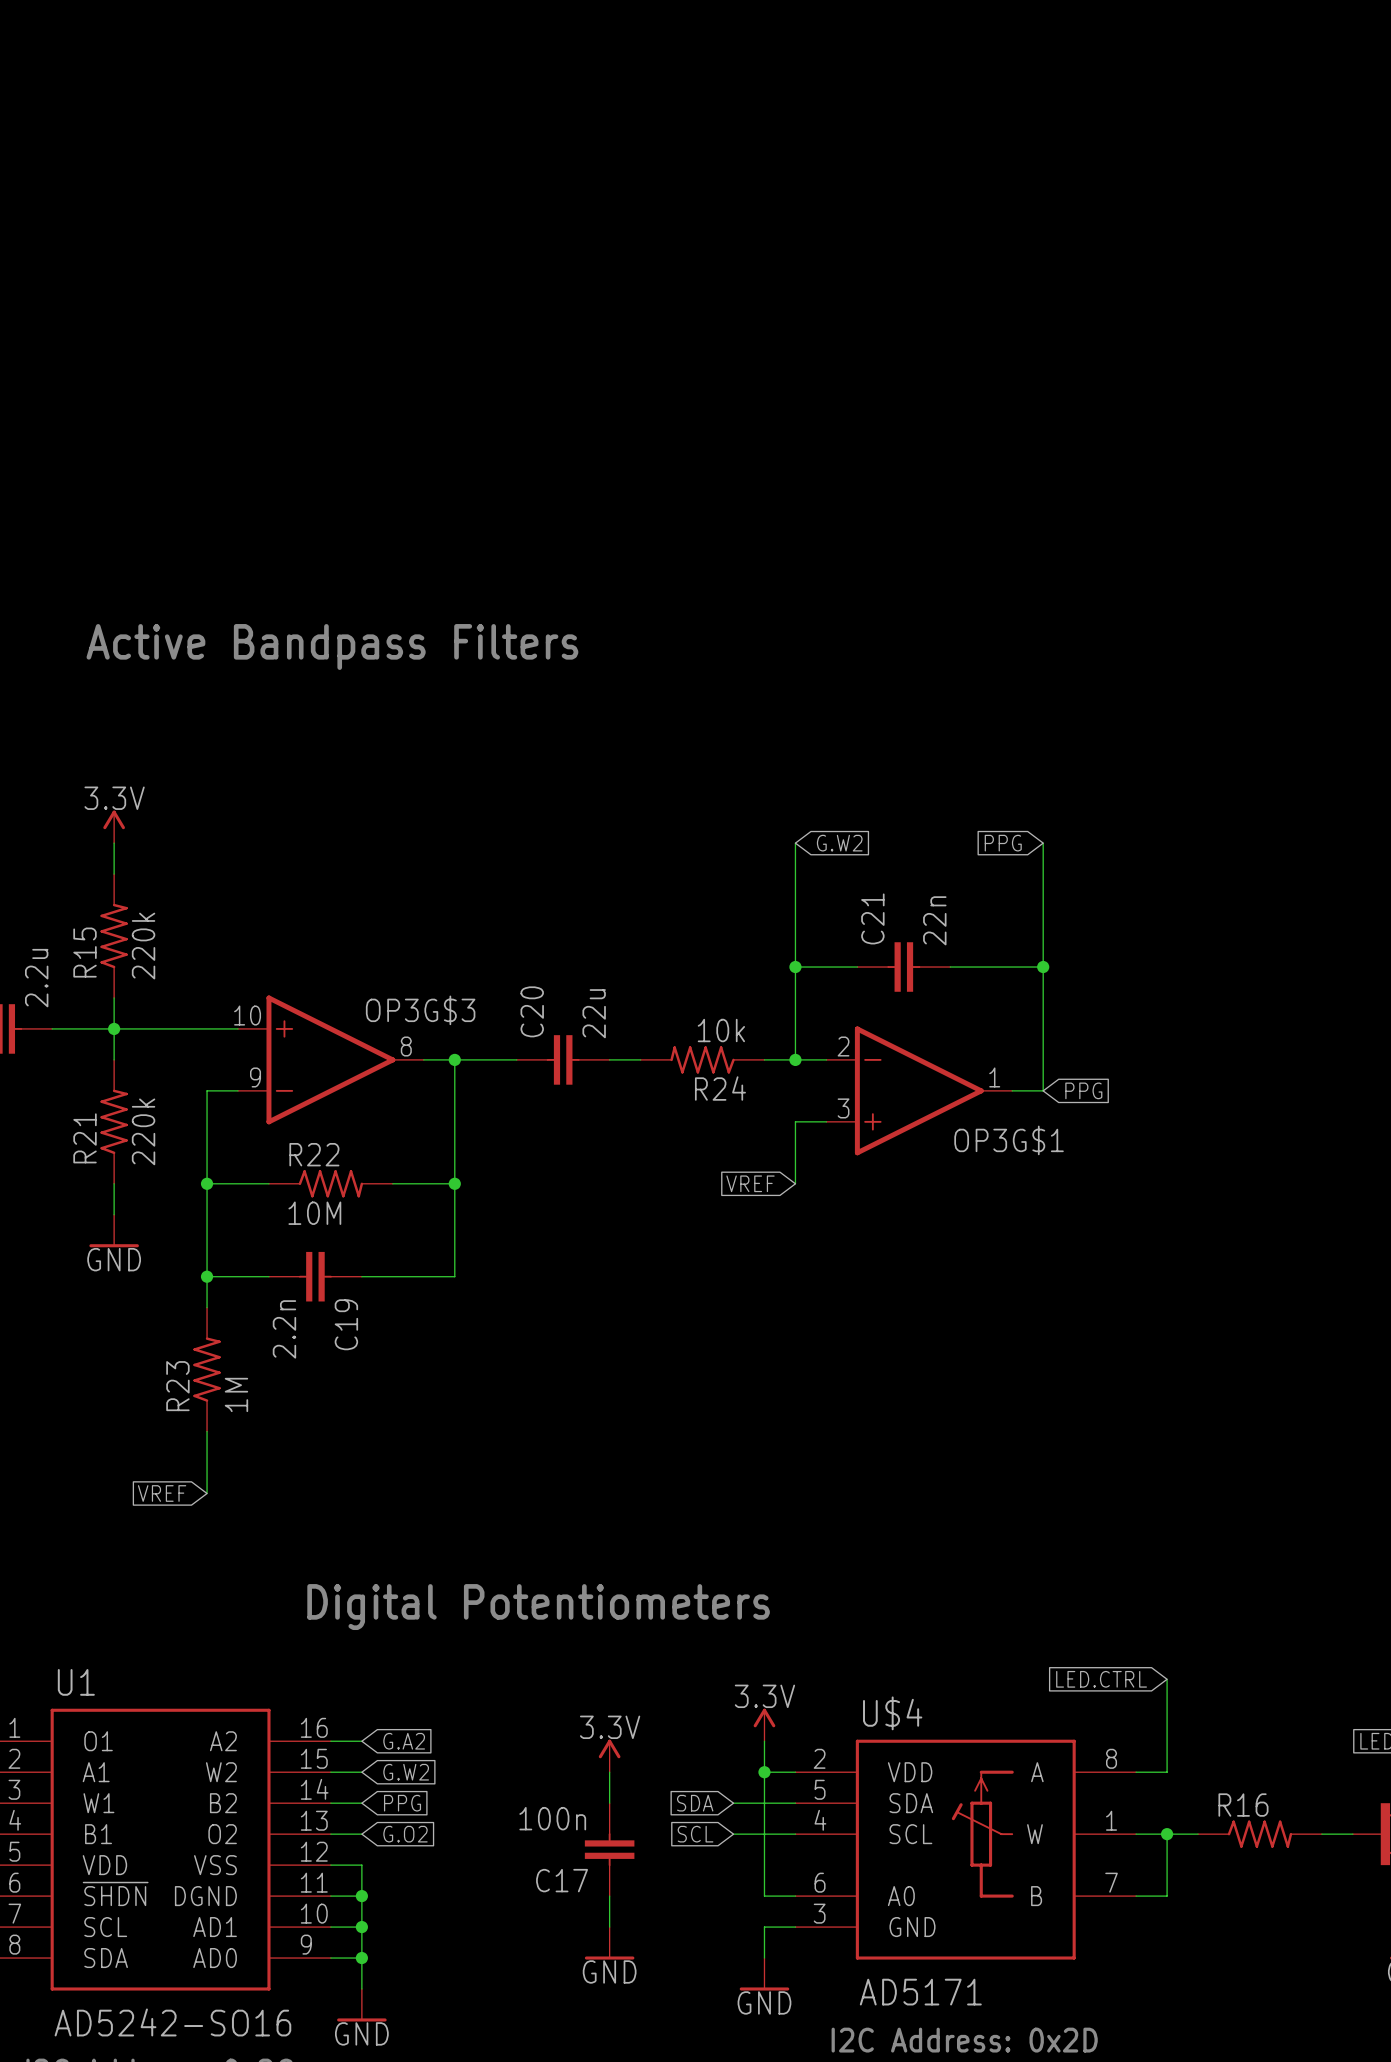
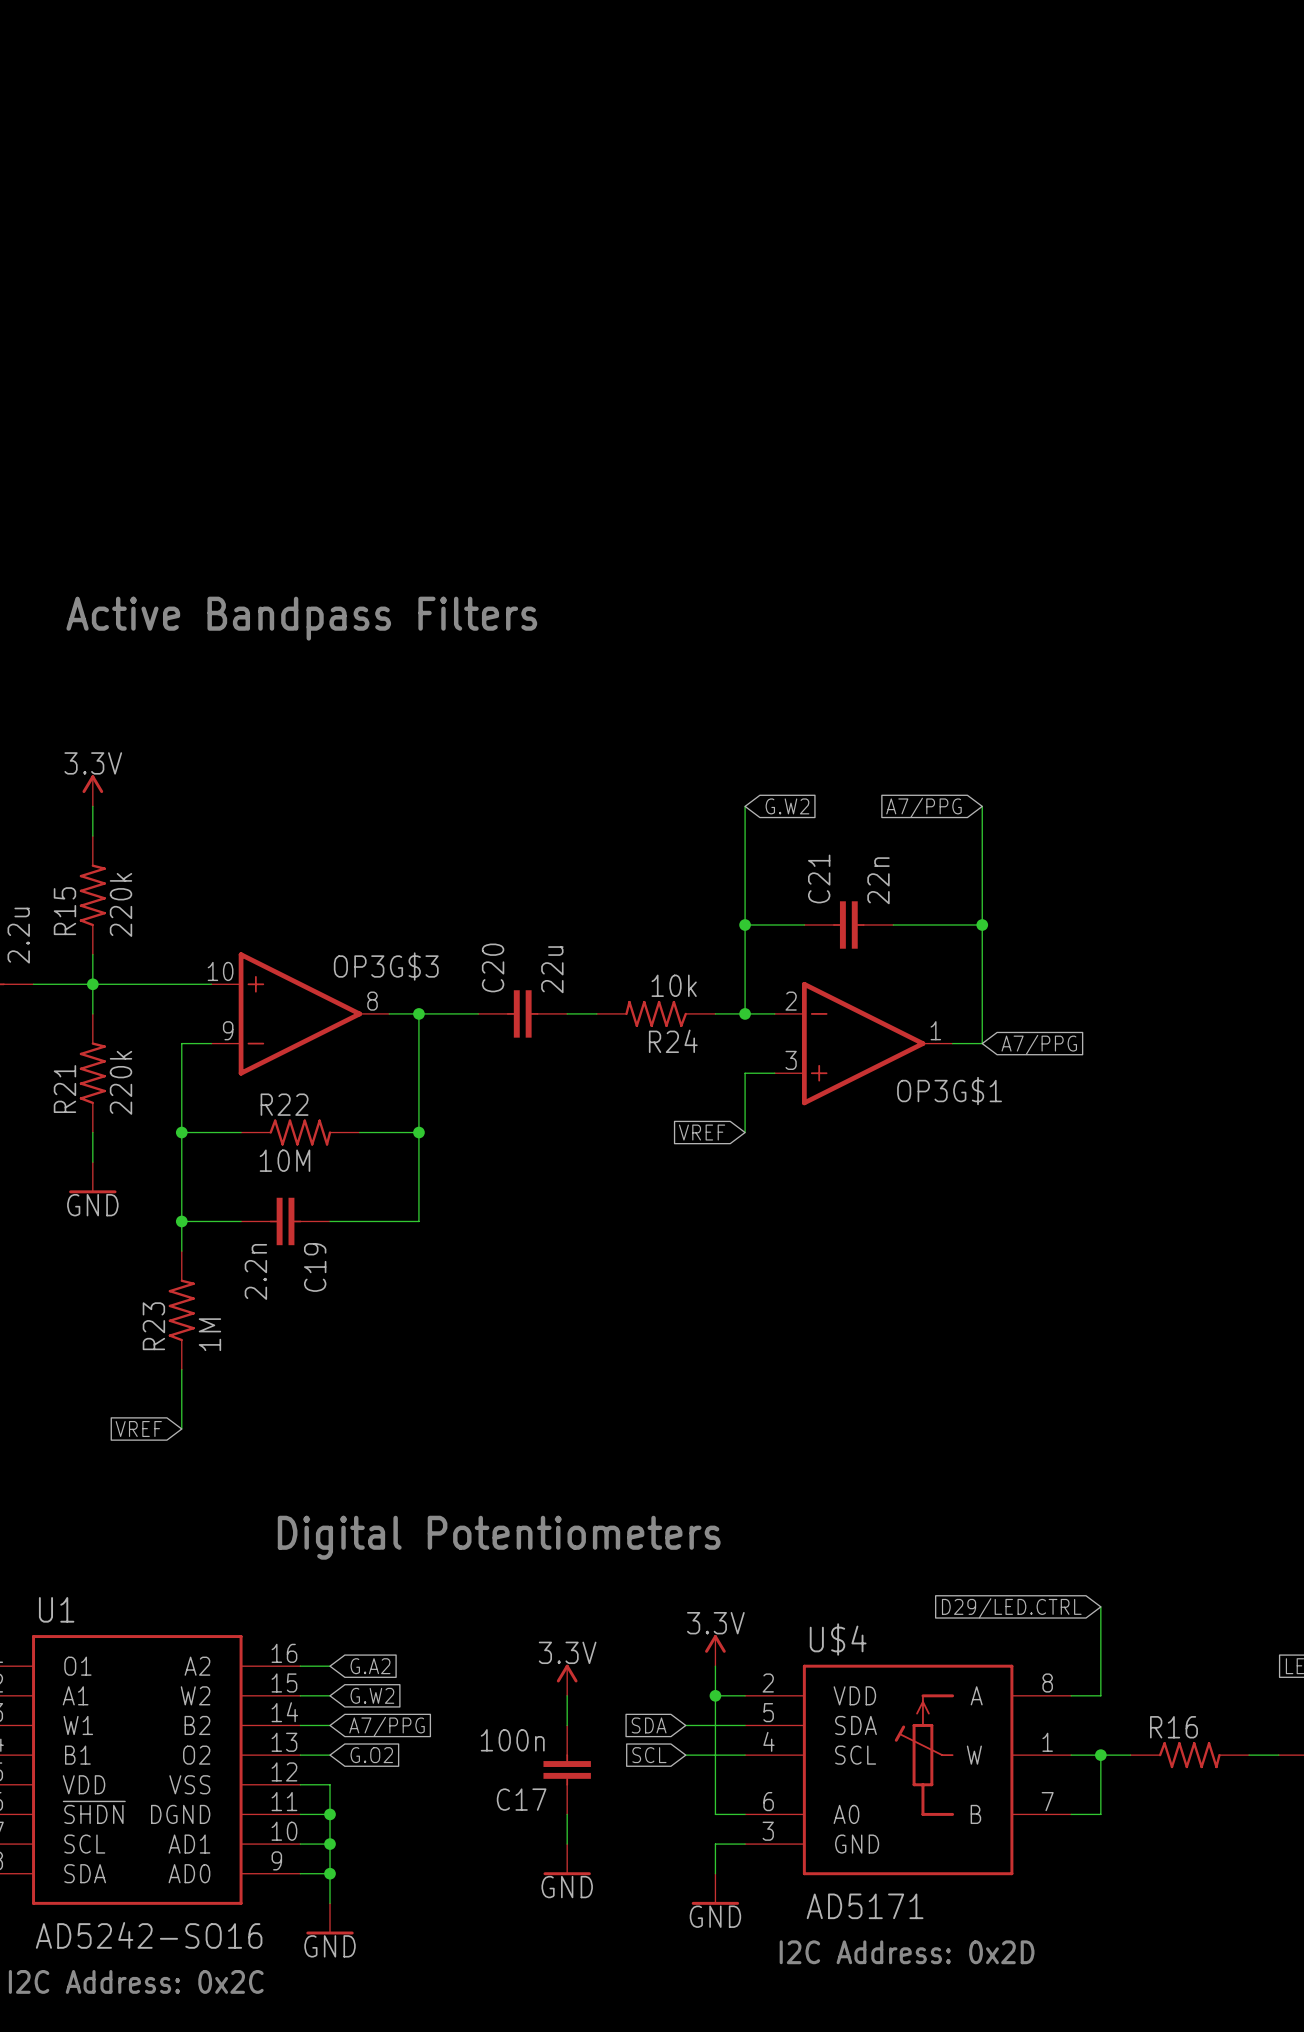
global label: PPG (1003, 843) -> A7/PPG (923, 807)
global label: PPG (1083, 1090) -> A7/PPG (1039, 1045)
global label: LED.CTRL (1101, 1679) -> D29/LED.CTRL (1011, 1608)
global label: PPG (402, 1803) -> A7/PPG (387, 1726)

